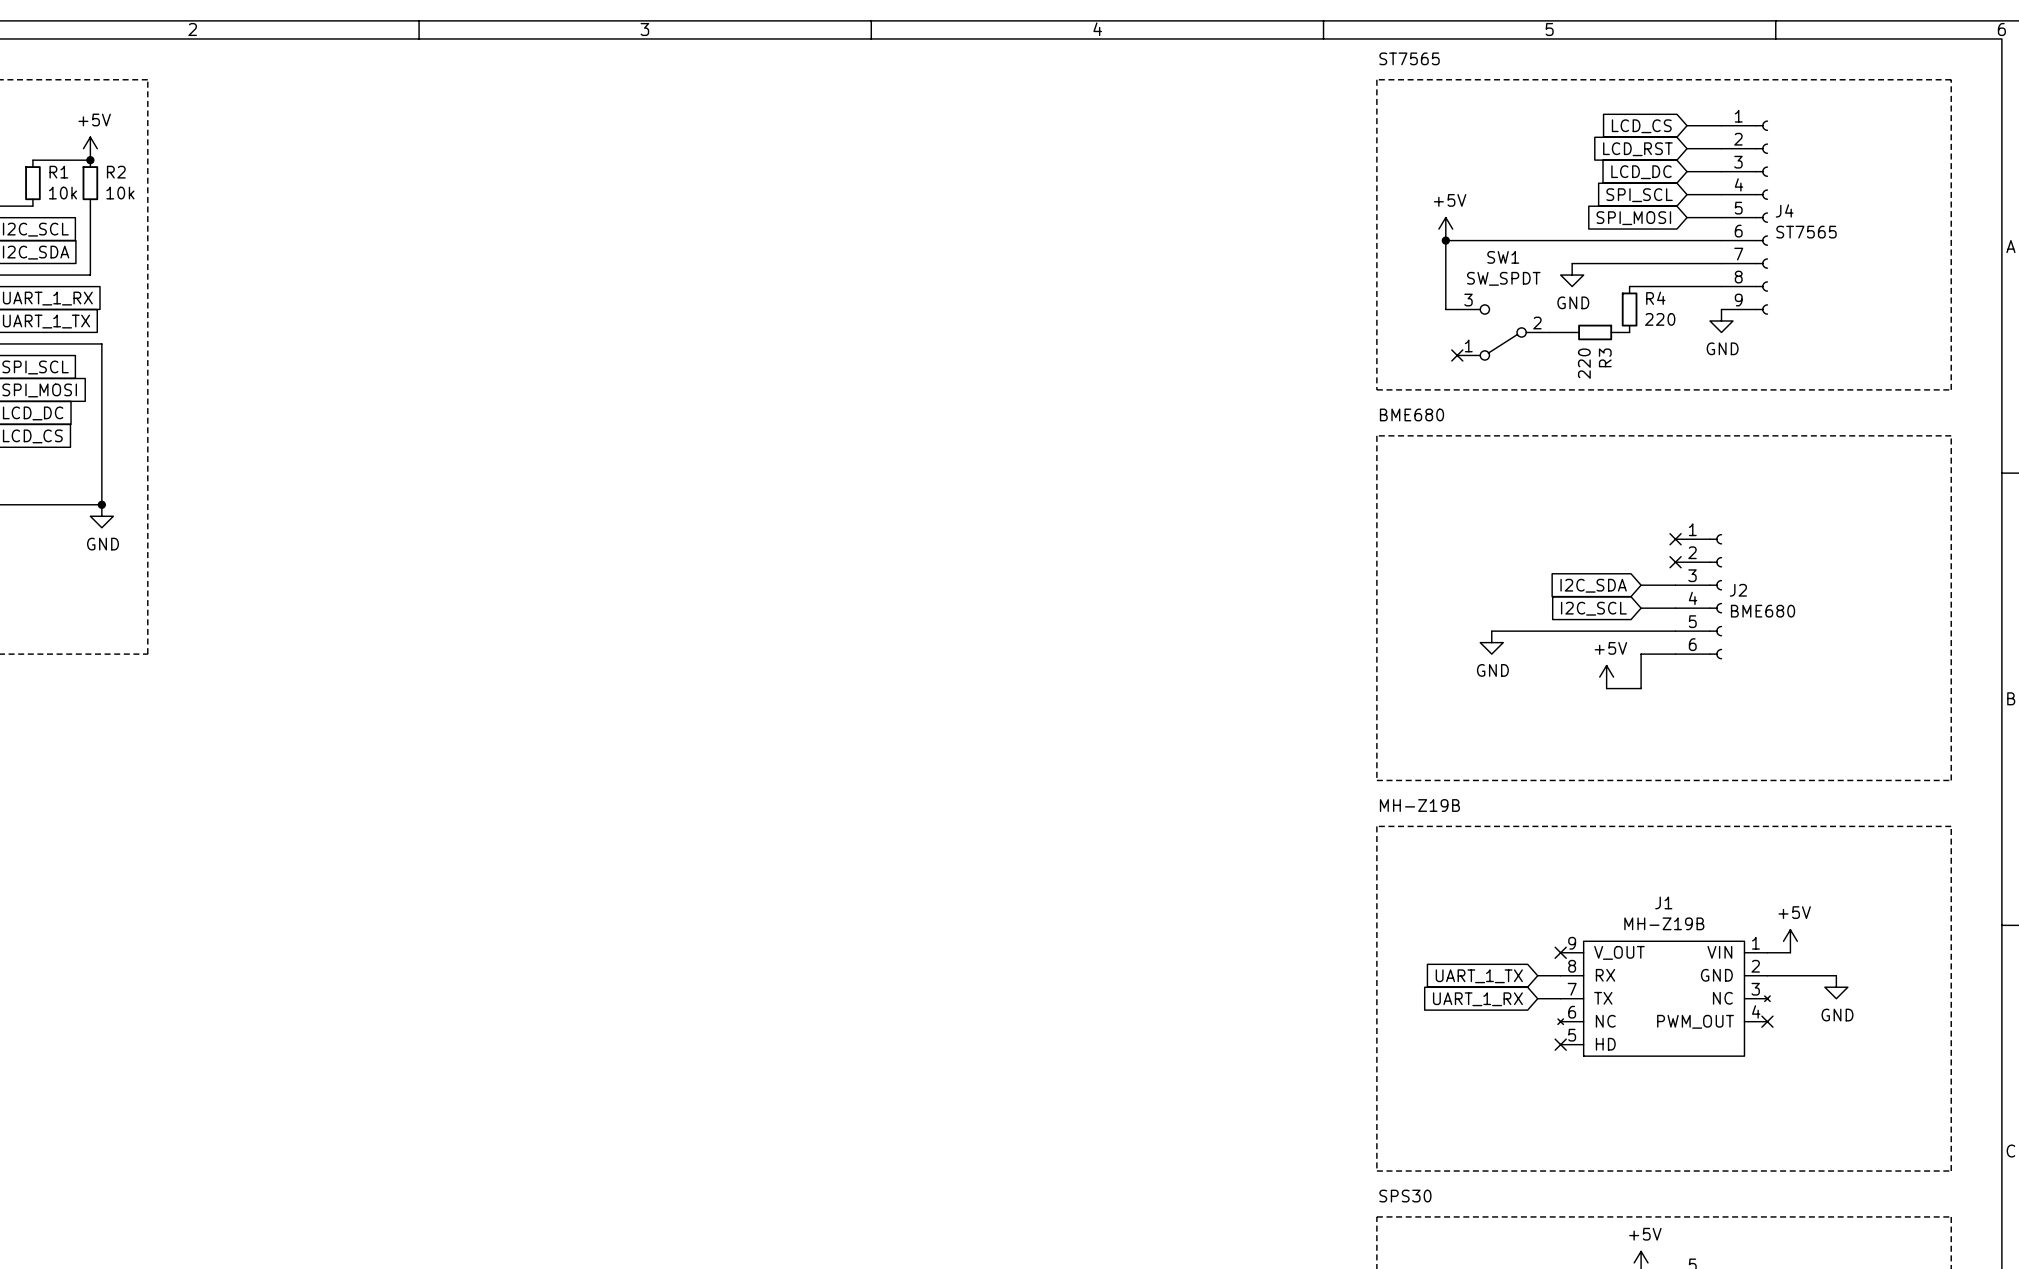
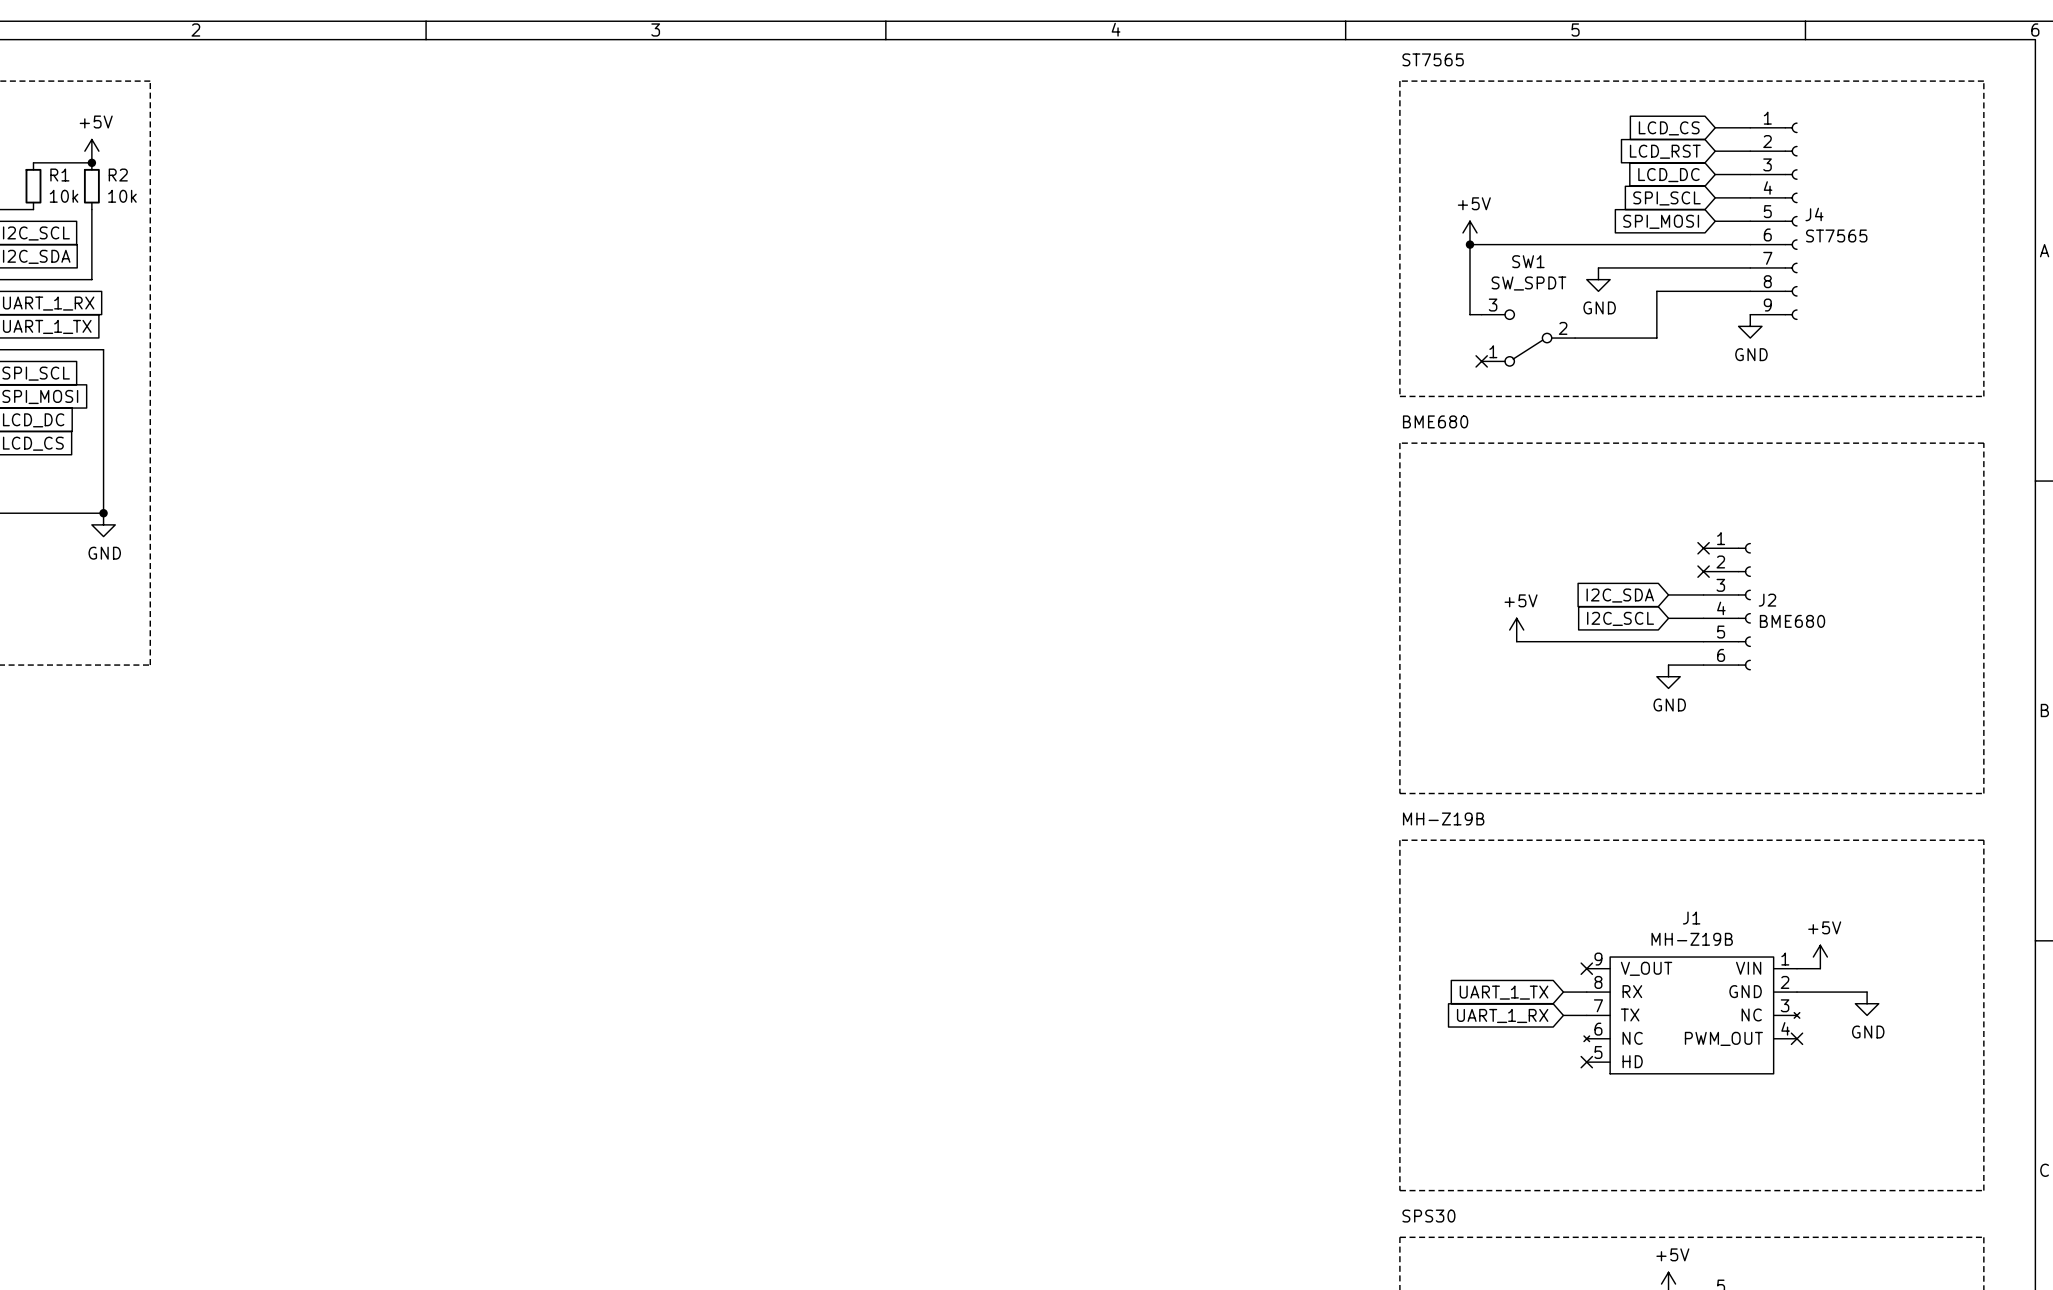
wire: none -> (1656, 291) (1656, 338)
R4: 220 (1629, 309) -> none
wire: none -> (1598, 338) (1645, 338)
R3: 220 (1595, 332) -> none
power symbol position: GND (1491, 642) -> GND (1668, 676)
wire: (1641, 654) (1641, 688) (1606, 688) -> none
power symbol position: +5V (1606, 677) -> +5V (1516, 630)

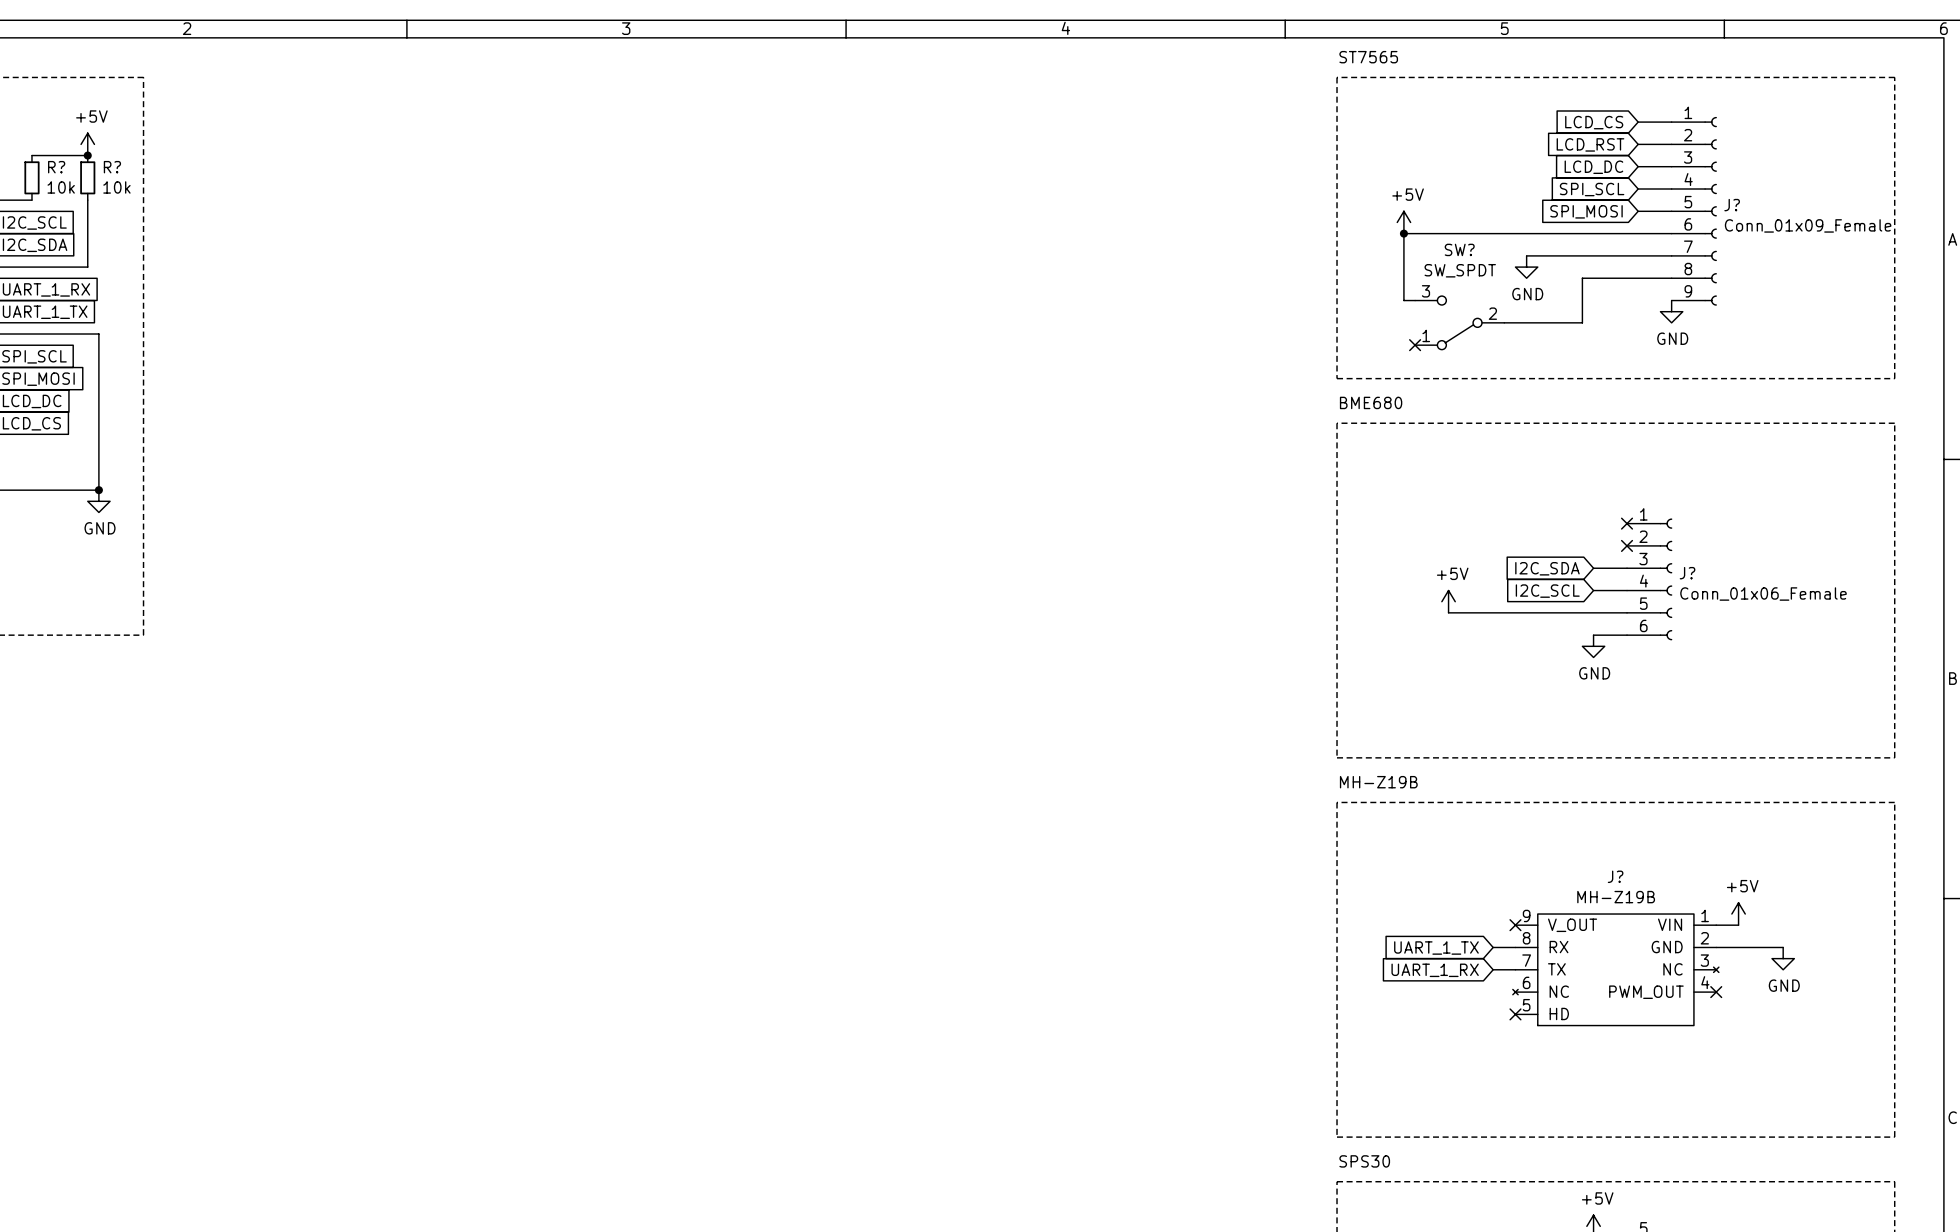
R1 name: R1 (59, 175) -> R? (56, 167)
R2 name: R2 (118, 175) -> R? (112, 167)
J4 name: J4 (1814, 214) -> J? (1732, 205)
J4 value: ST7565 (1836, 235) -> Conn_01x09_Female (1808, 225)
SW1 name: SW1 (1528, 261) -> SW? (1459, 249)
J2 name: J2 (1767, 600) -> J? (1687, 573)
J2 value: BME680 (1792, 621) -> Conn_01x06_Female (1763, 594)
J1 name: J1 (1691, 918) -> J? (1615, 876)

